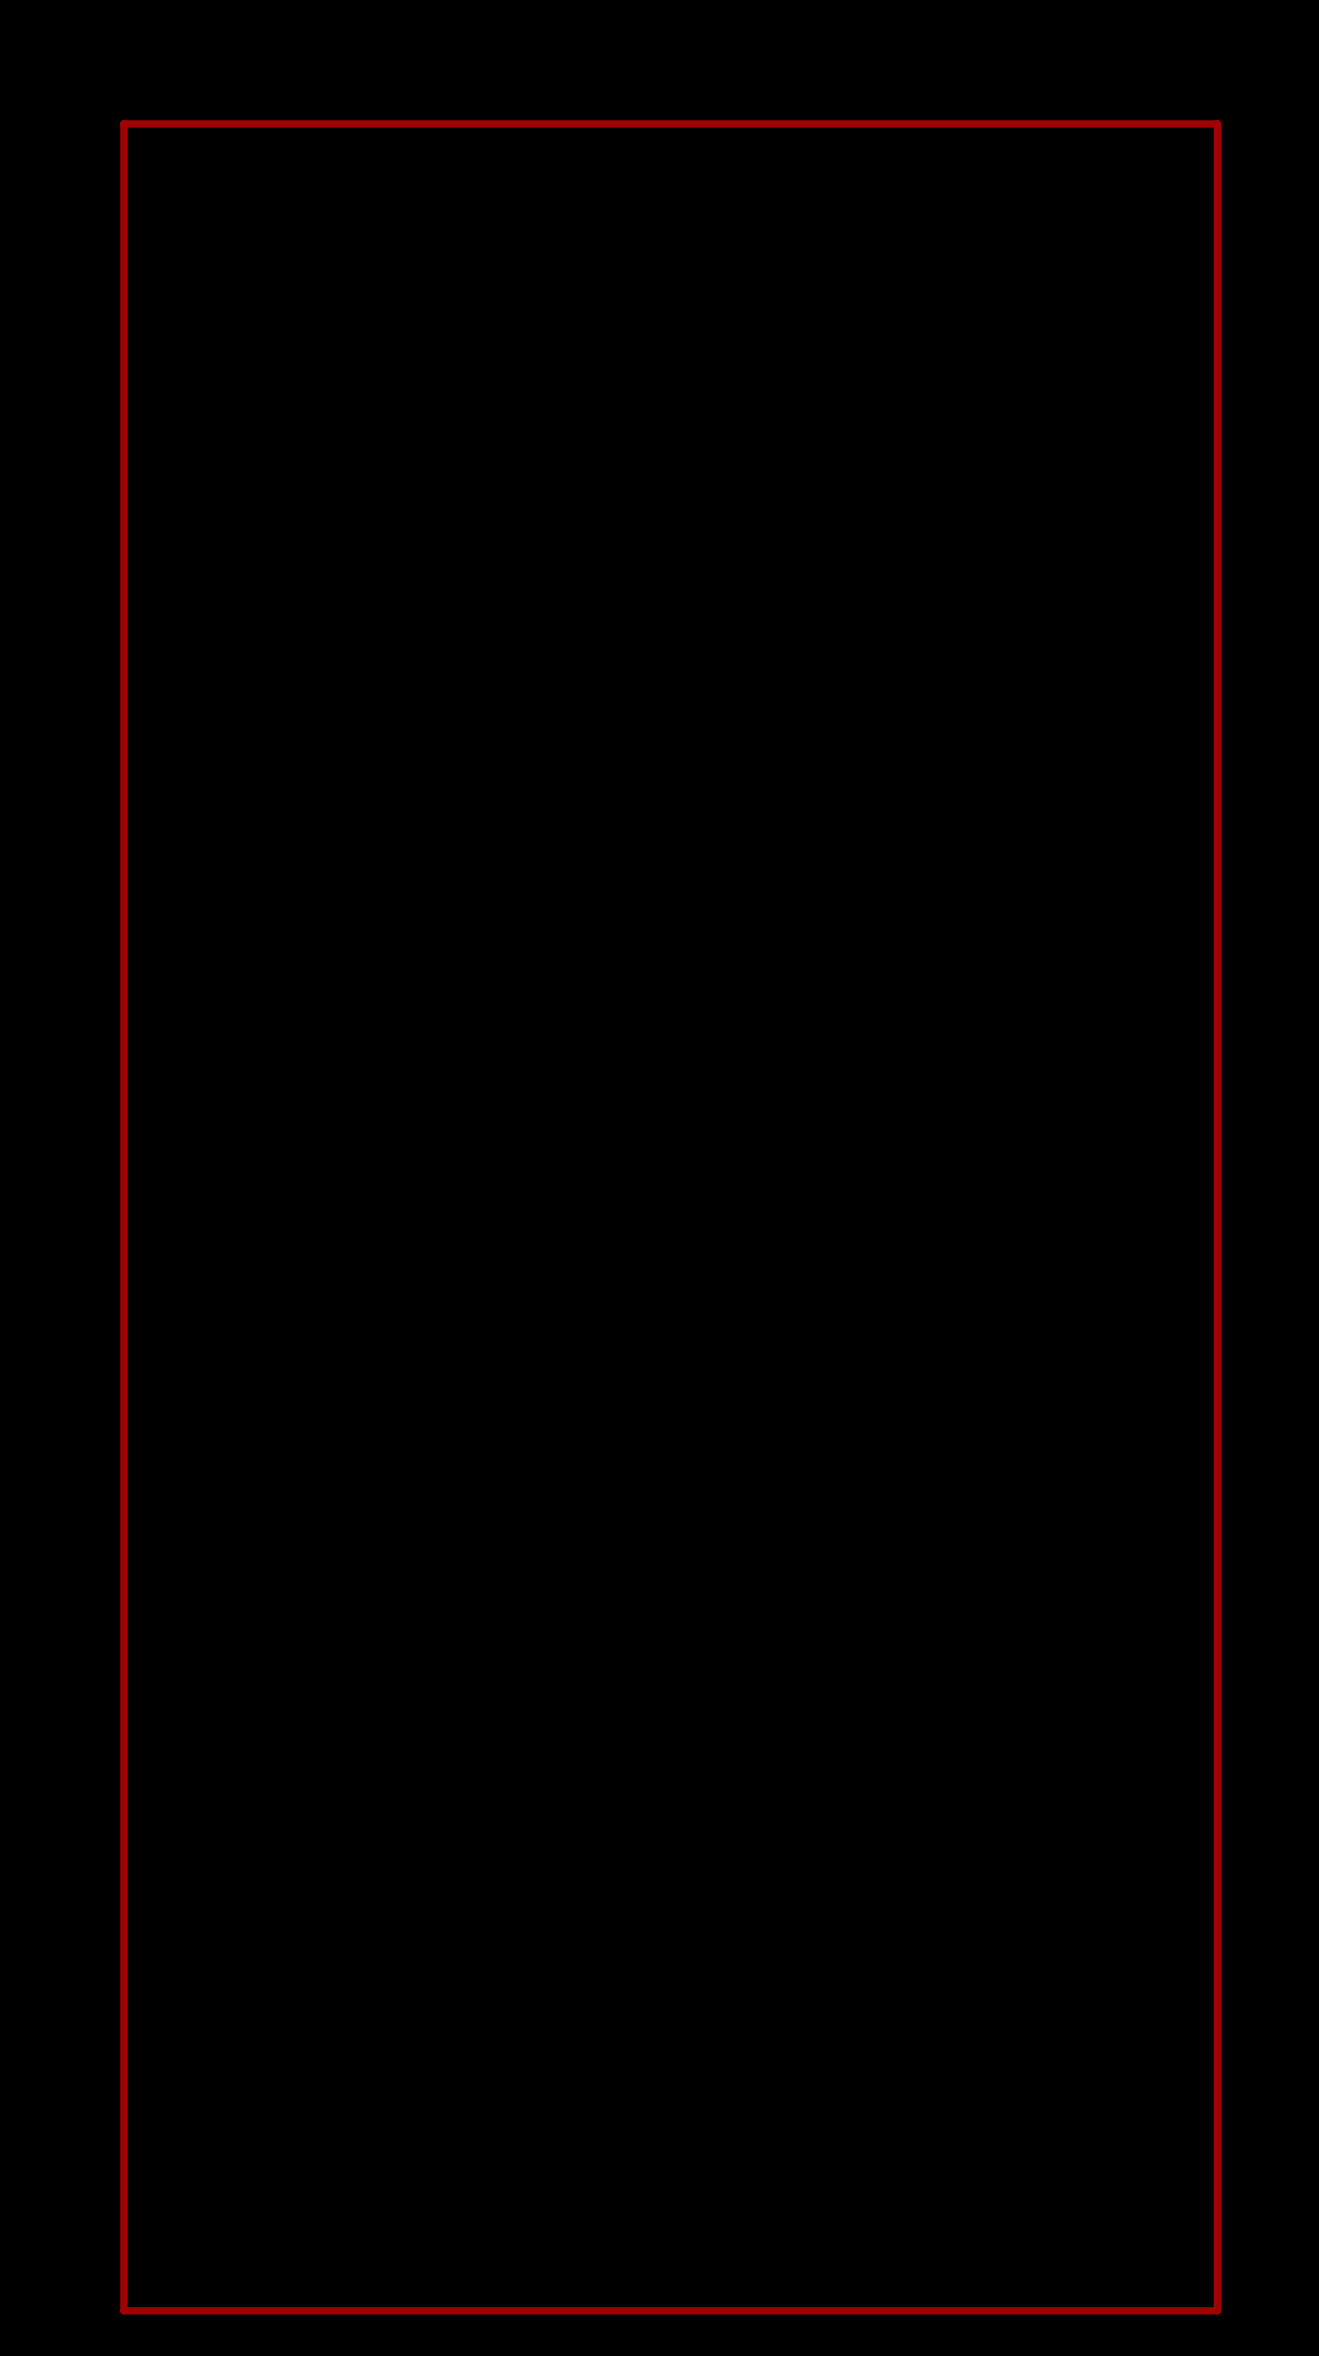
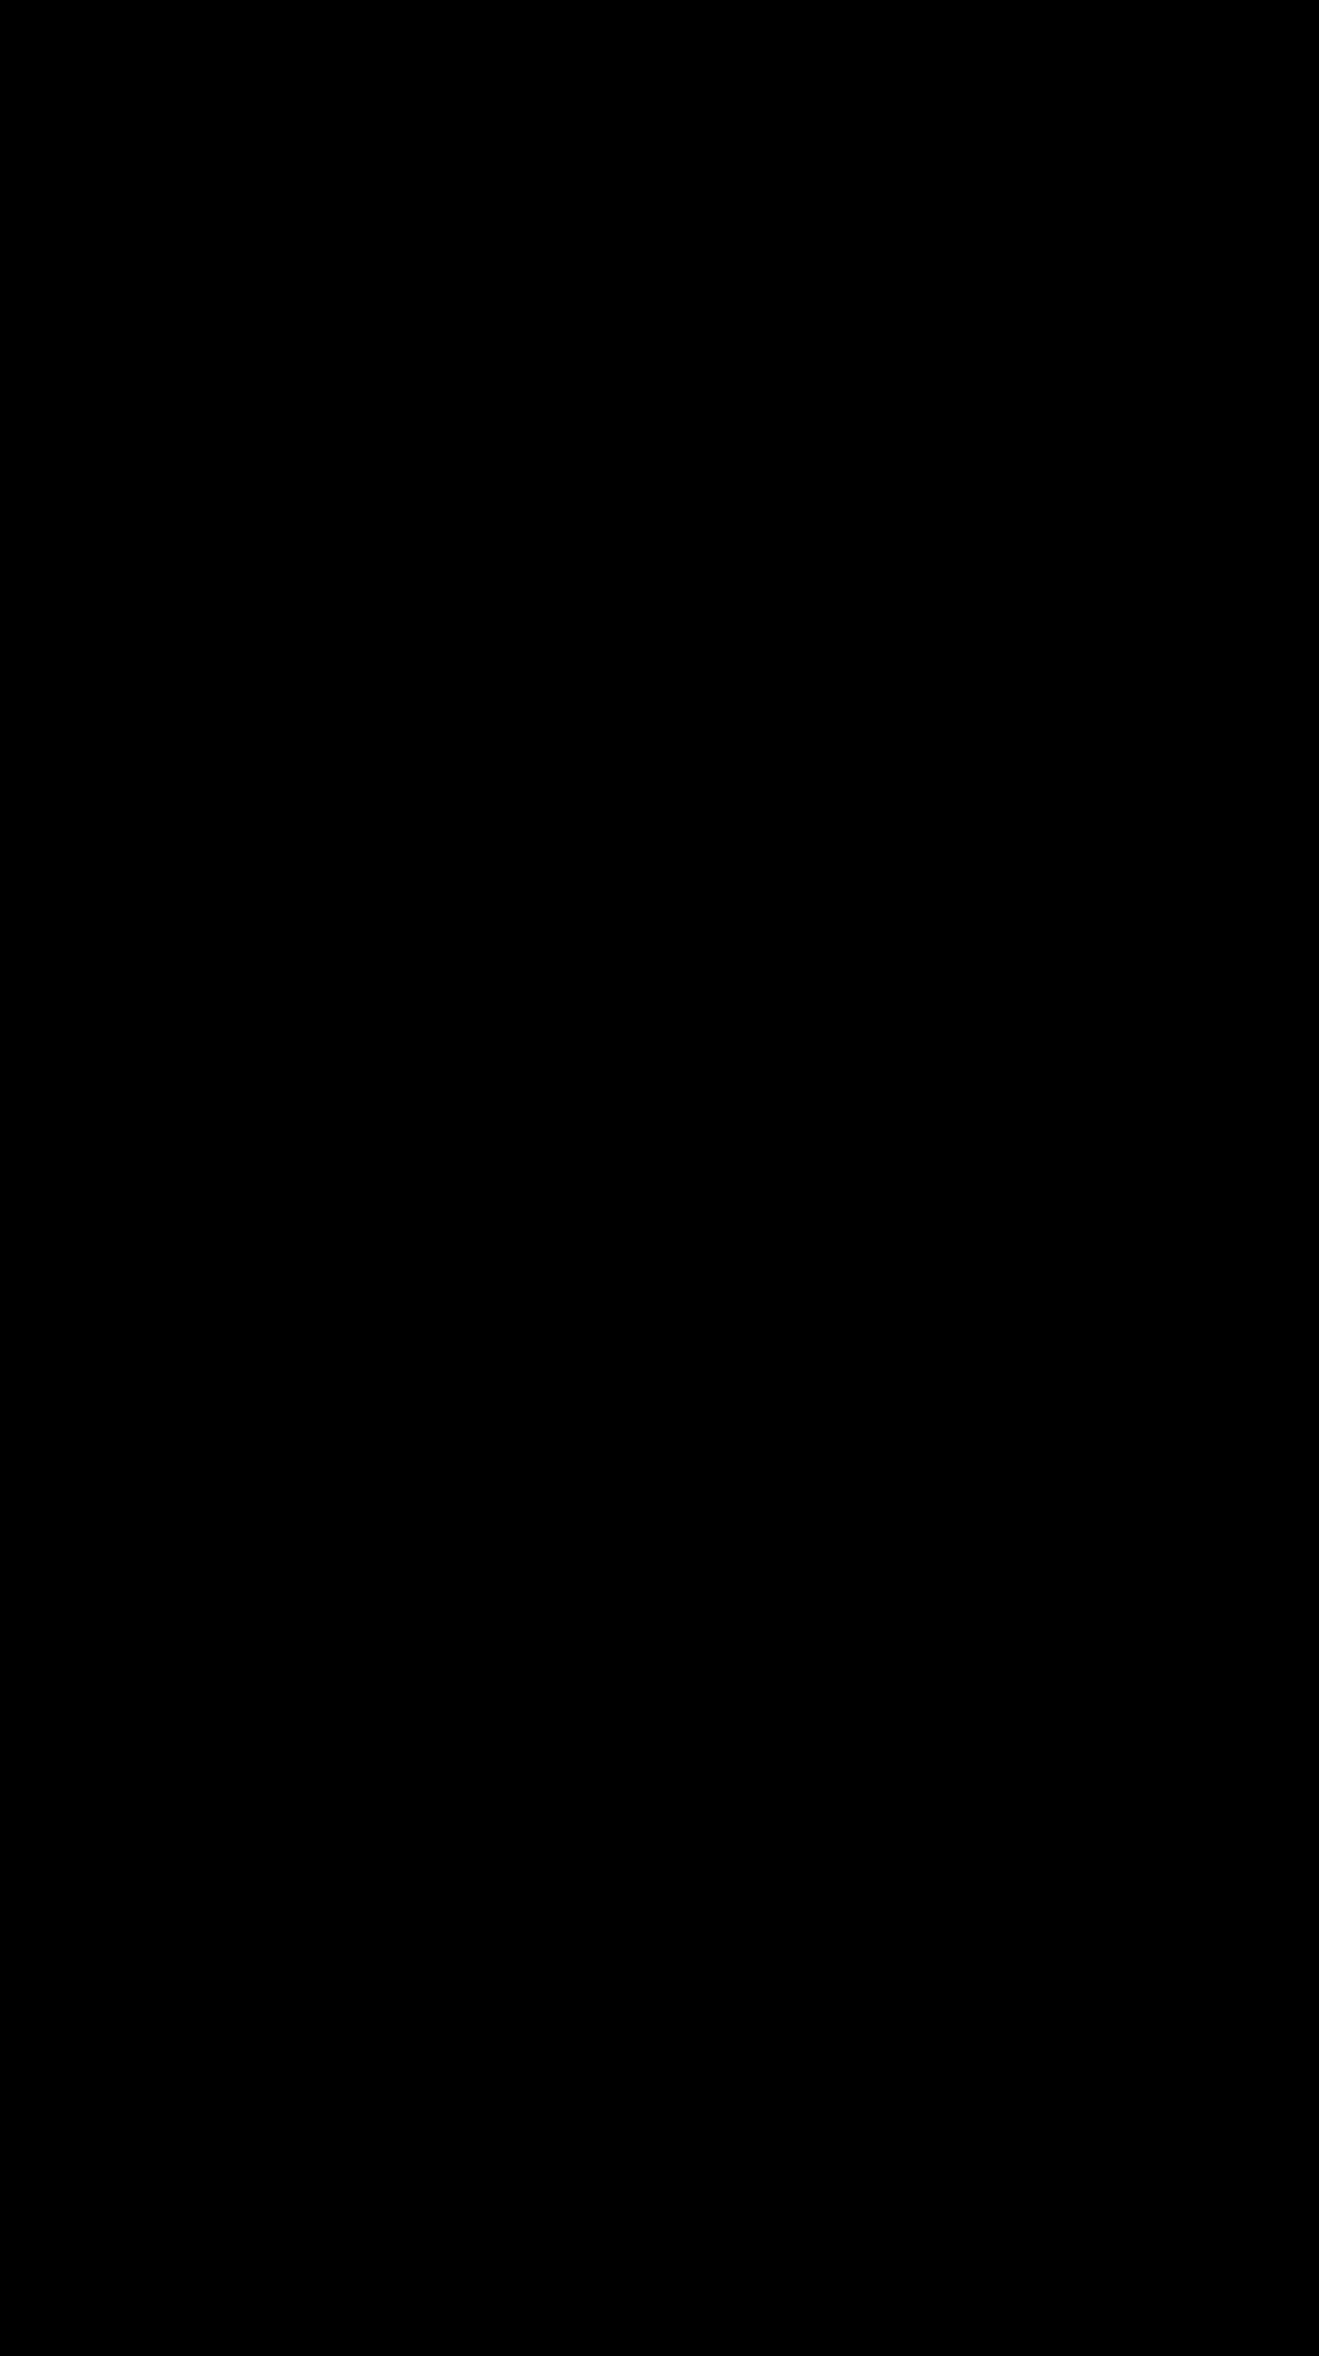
track: (123, 123) (1217, 123) (1217, 2310) (123, 2310) (123, 123) -> none

